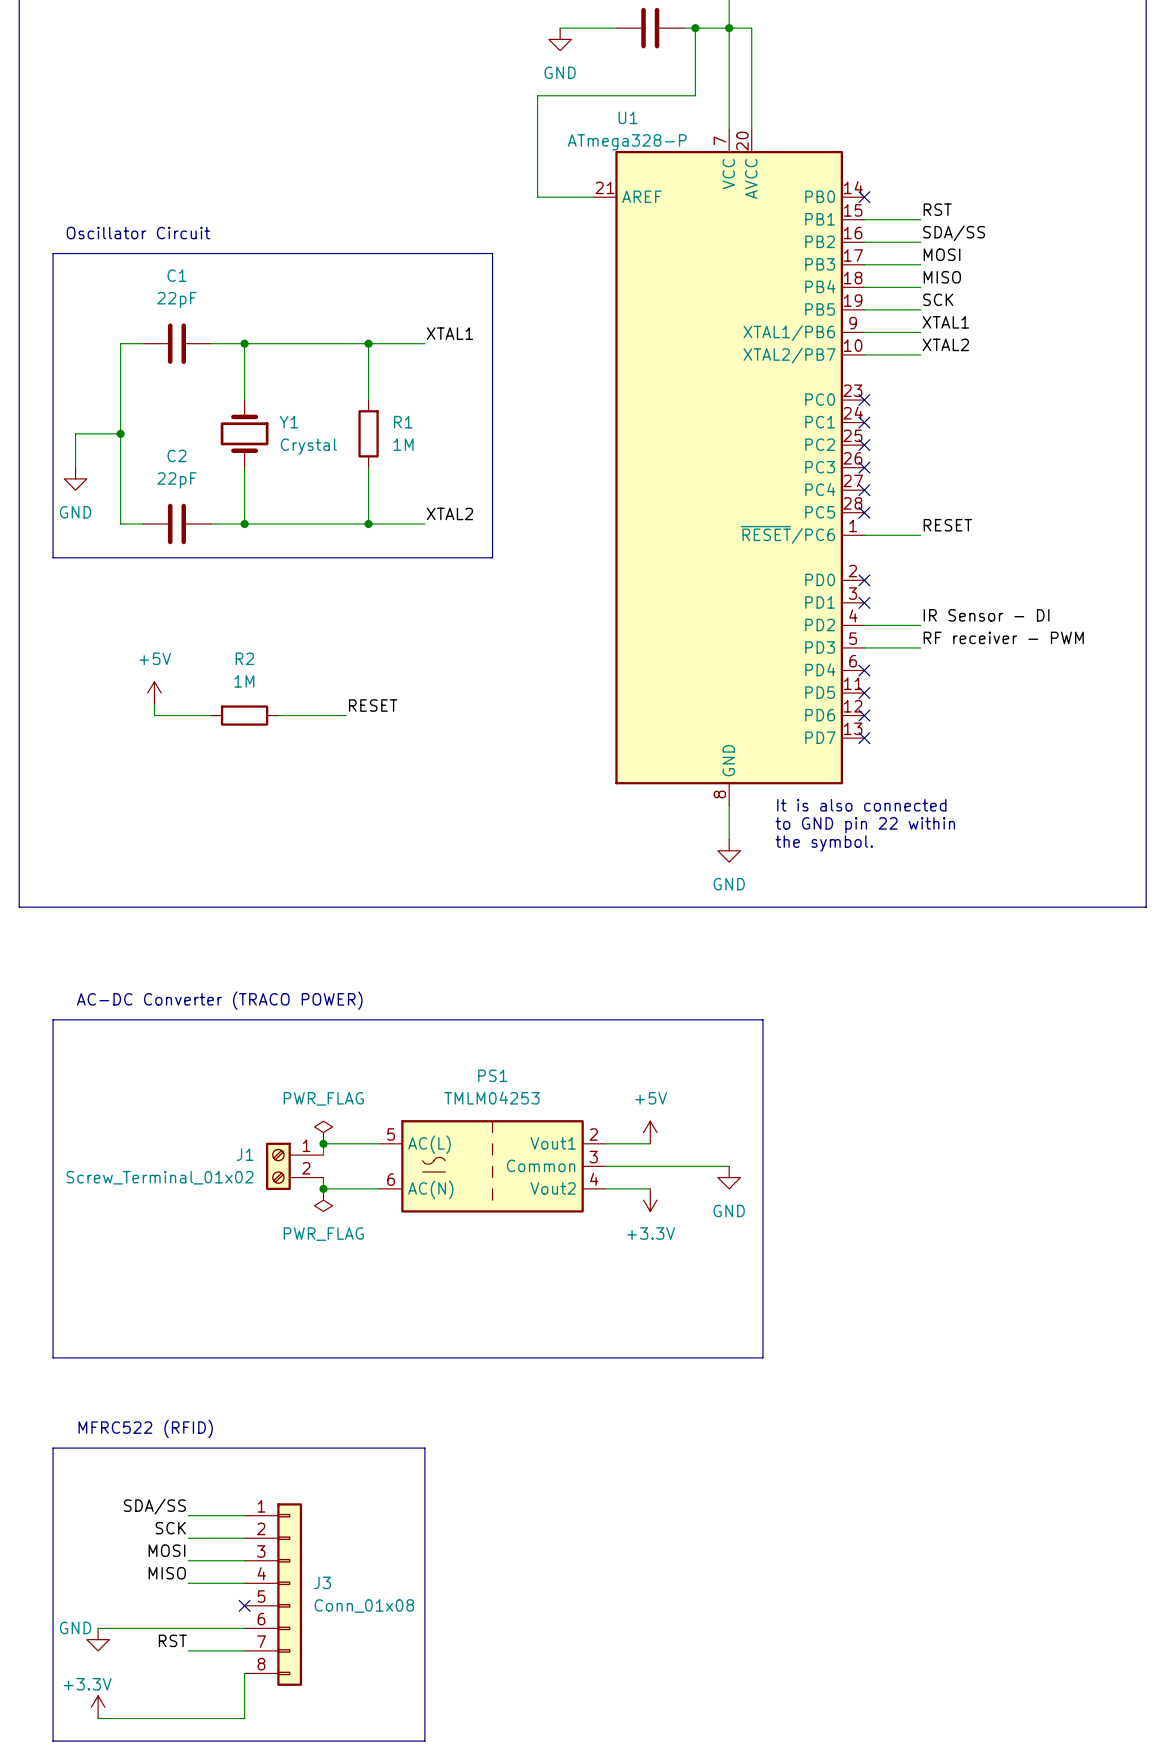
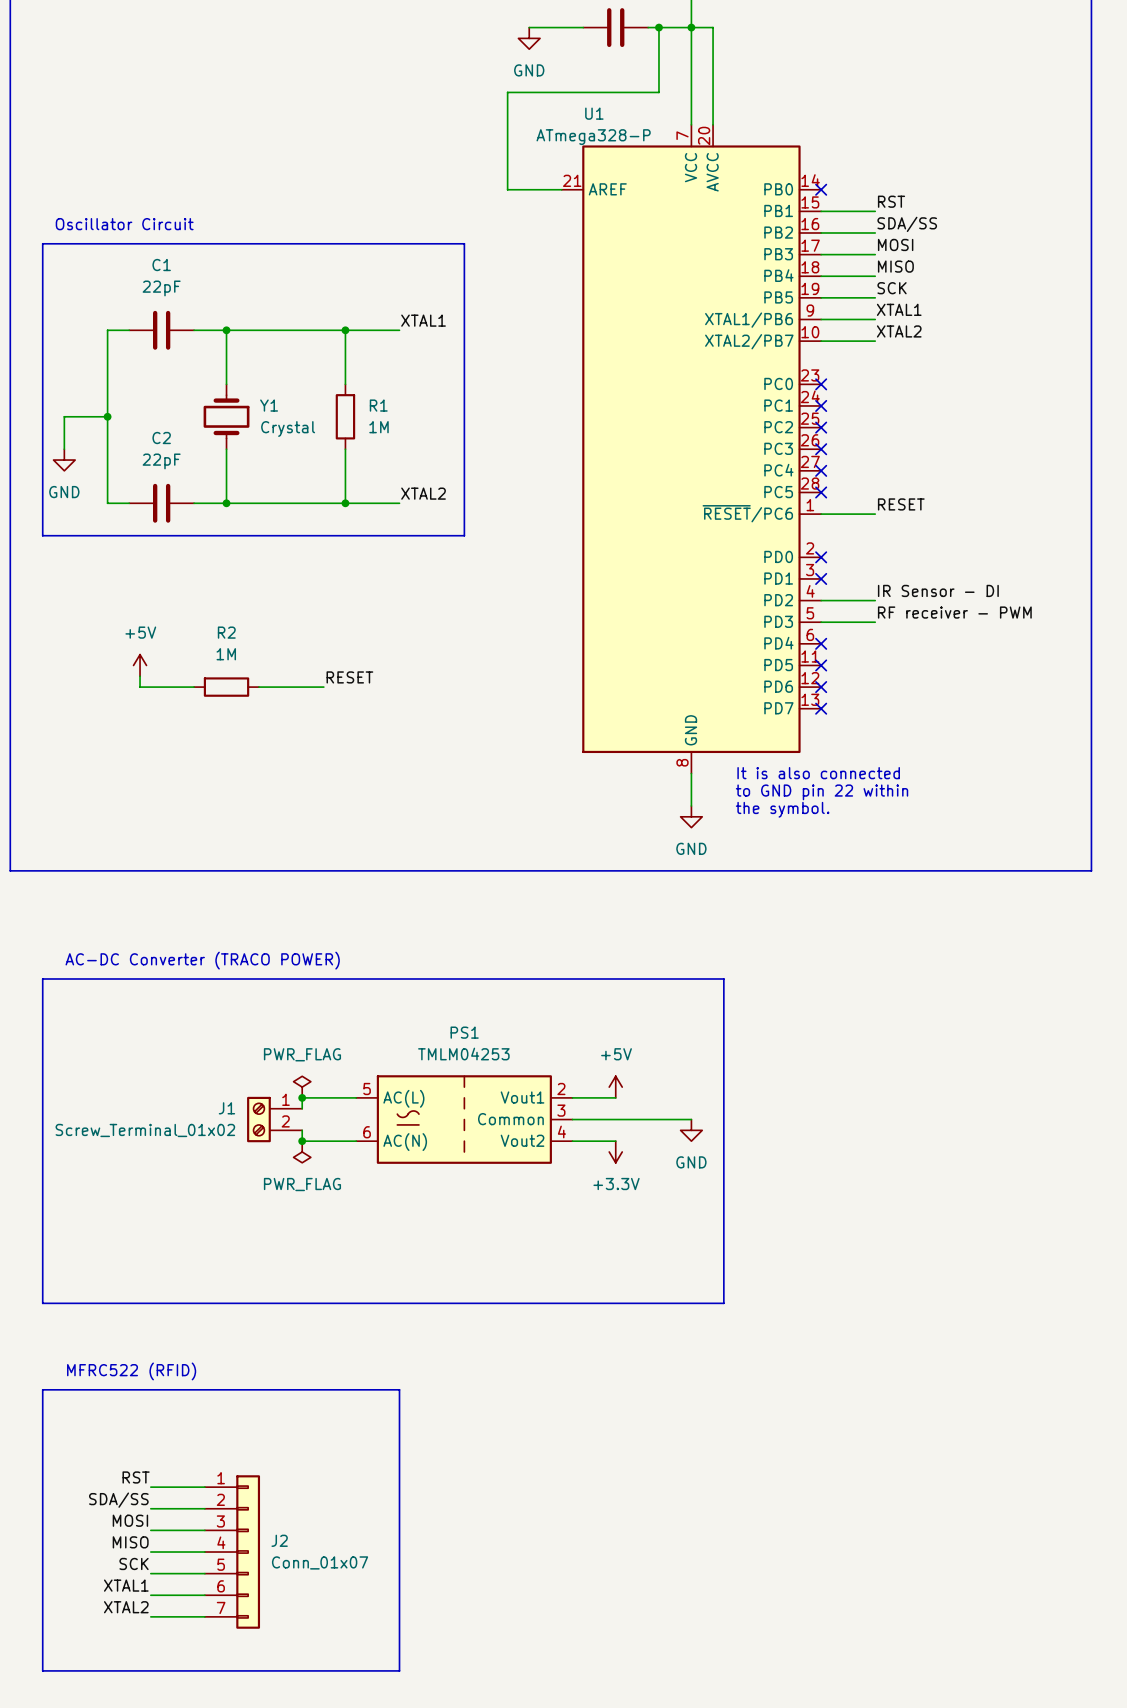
label position: SDA/SS (154, 1506) -> SDA/SS (118, 1500)
wire: (188, 1515) (244, 1515) -> (150, 1487) (204, 1487)
label position: SCK (170, 1528) -> SCK (134, 1563)
wire: (188, 1538) (244, 1538) -> (150, 1508) (204, 1508)
label position: MOSI (166, 1550) -> MOSI (130, 1520)
wire: (188, 1560) (244, 1560) -> (150, 1530) (204, 1530)
label position: MISO (167, 1573) -> MISO (130, 1542)
wire: (188, 1583) (244, 1583) -> (150, 1552) (204, 1552)
J3: Conn_01x08 (273, 1594) -> none
no-connect mark: (244, 1605) -> none
J2: none -> Conn_01x07 (232, 1552)
wire: (98, 1628) (244, 1628) -> none
power symbol: GND (98, 1639) -> none
wire: none -> (150, 1573) (204, 1573)
label position: RST (172, 1640) -> RST (136, 1477)
wire: (188, 1650) (244, 1650) -> (150, 1616) (204, 1616)
label: none -> XTAL1 (126, 1585)
wire: none -> (150, 1595) (204, 1595)
wire: (244, 1673) (244, 1718) (98, 1718) -> none
label: none -> XTAL2 (126, 1607)
power symbol: +3.3V (98, 1707) -> none

